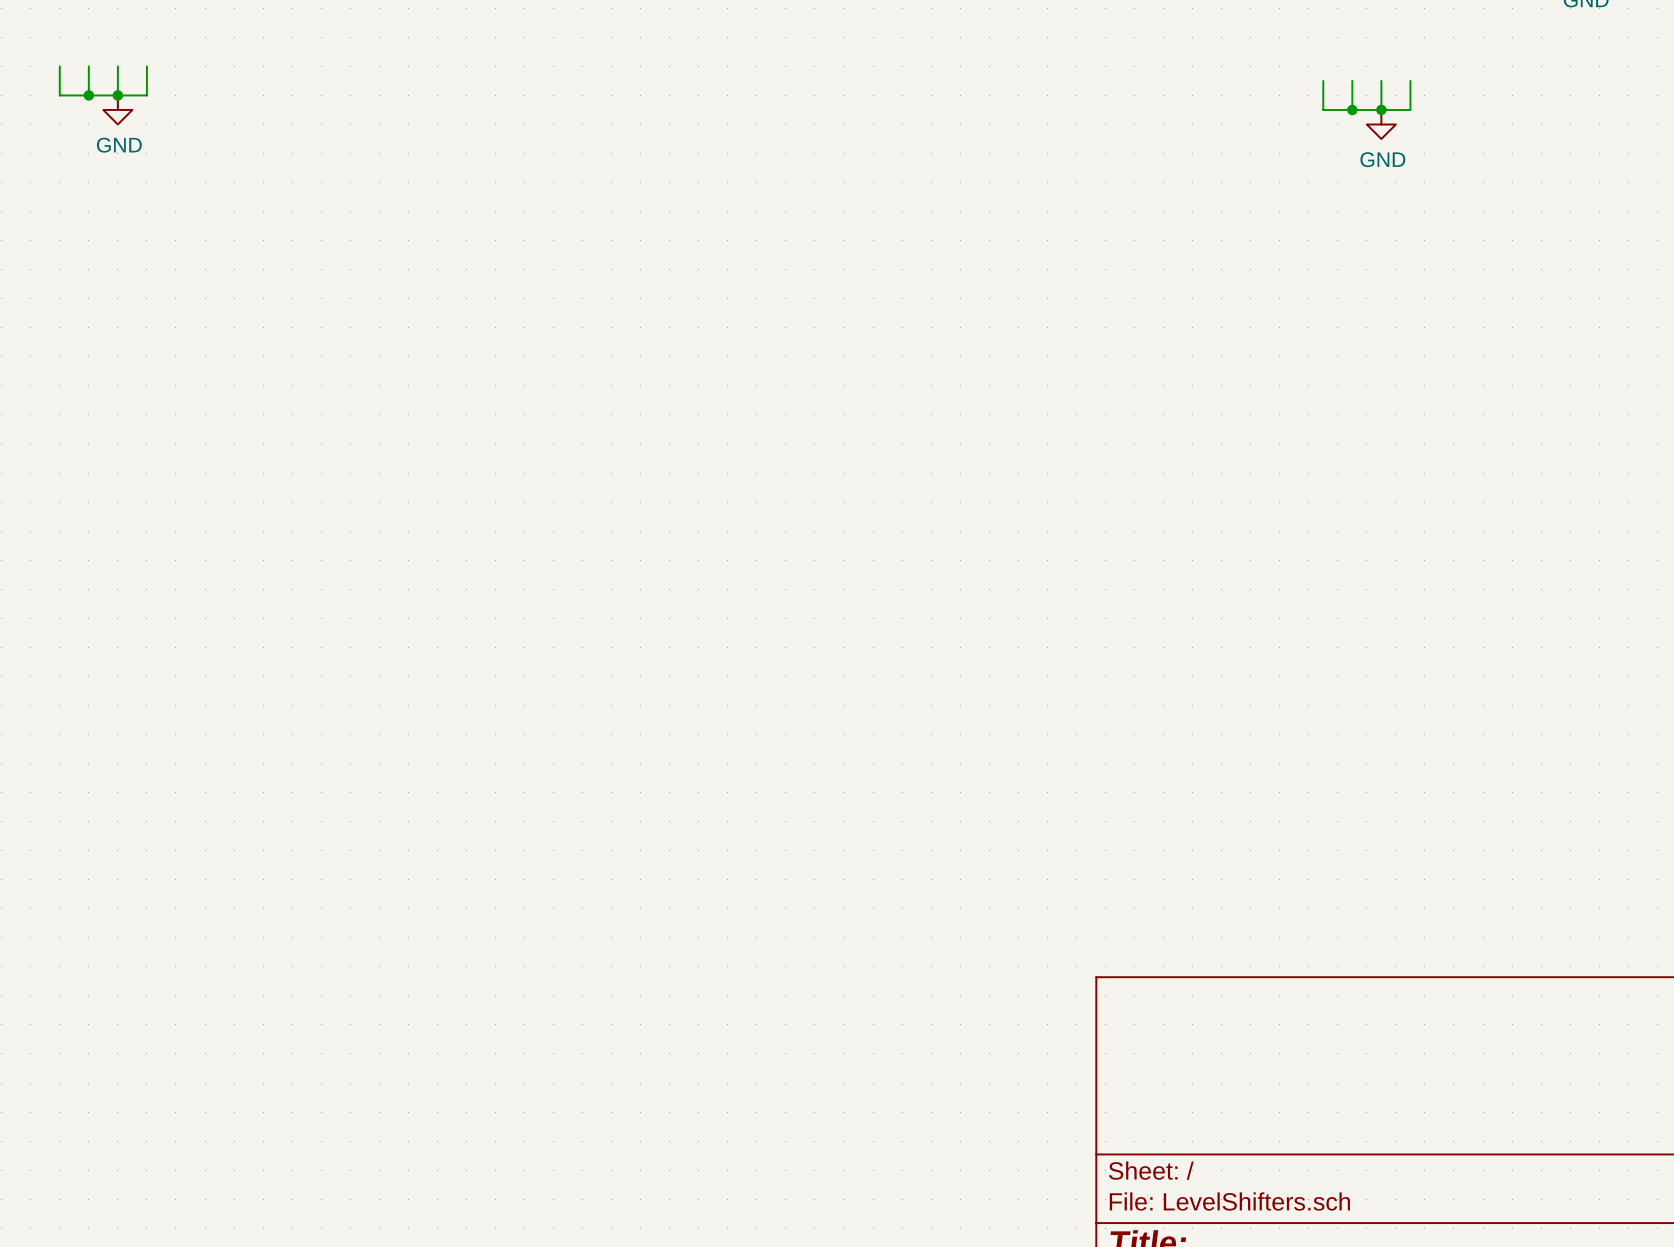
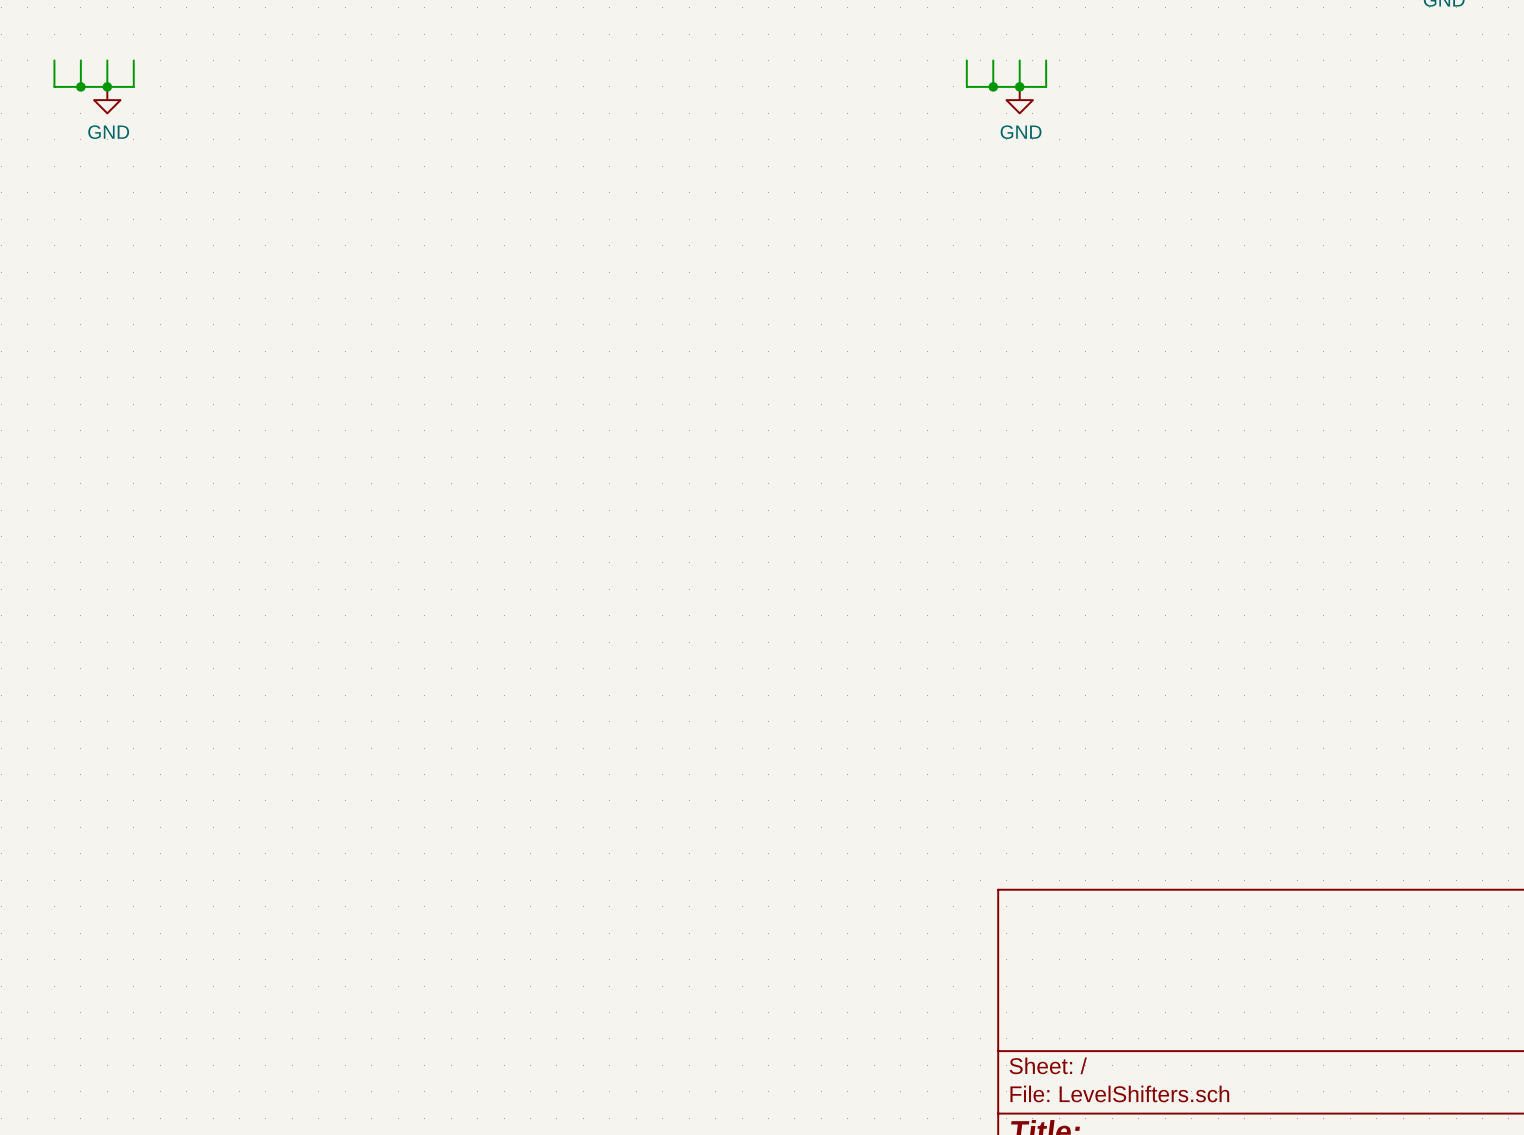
wire: (1323, 80) (1323, 109) (1410, 109) (1410, 80) -> (966, 60) (966, 86) (1046, 86) (1046, 60)
wire: (1352, 80) (1352, 109) -> (993, 60) (993, 86)
wire: (1381, 80) (1381, 109) -> (1019, 60) (1019, 86)
junction: none -> (993, 86)
junction: none -> (1019, 86)
junction: (1352, 109) -> none
junction: (1381, 109) -> none
power symbol position: GND (1381, 124) -> GND (1019, 100)

